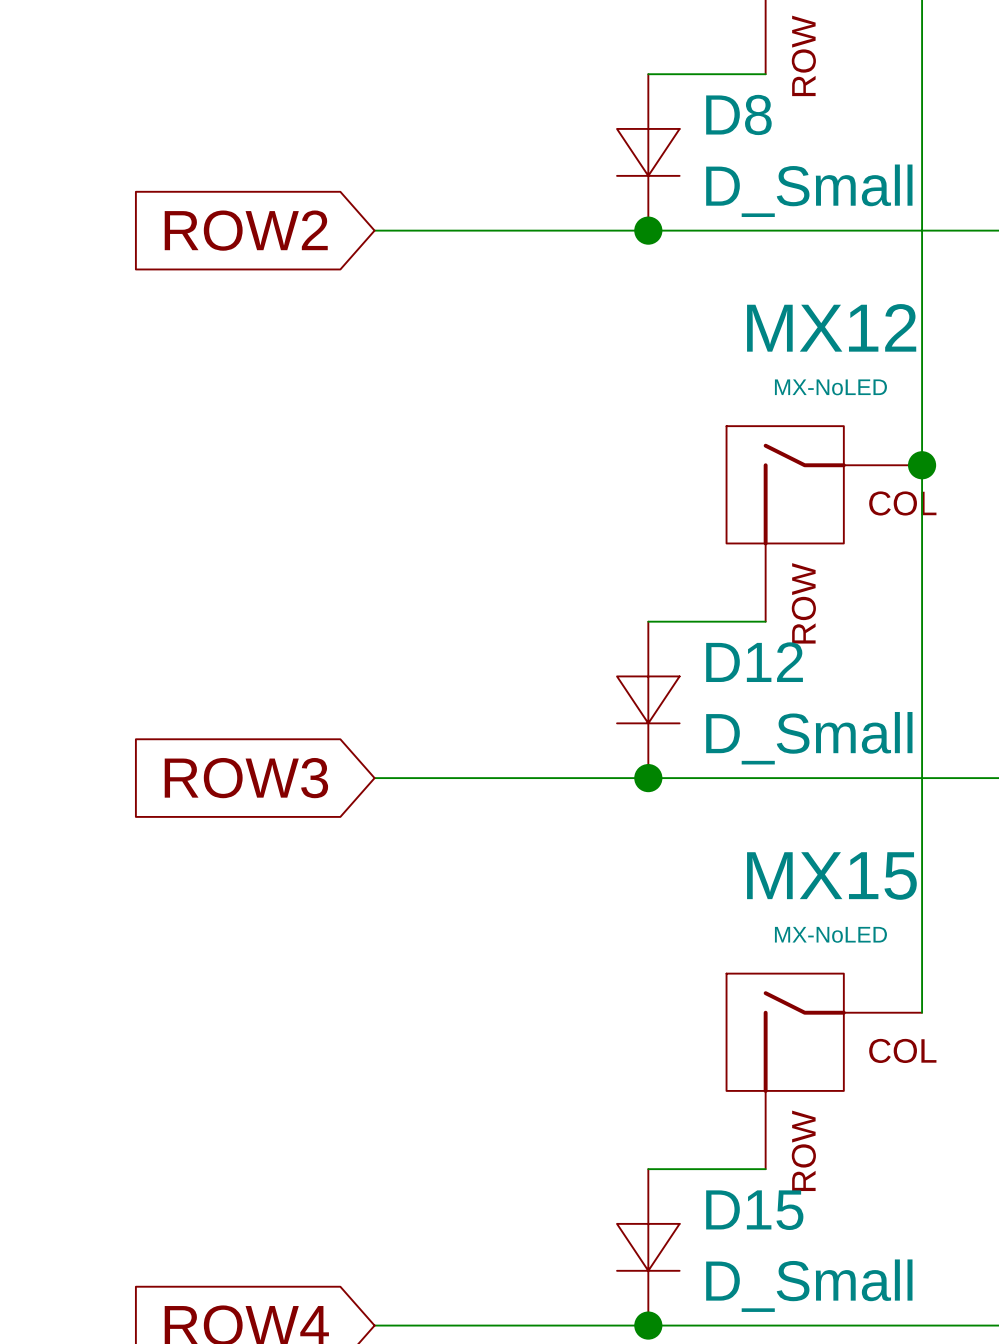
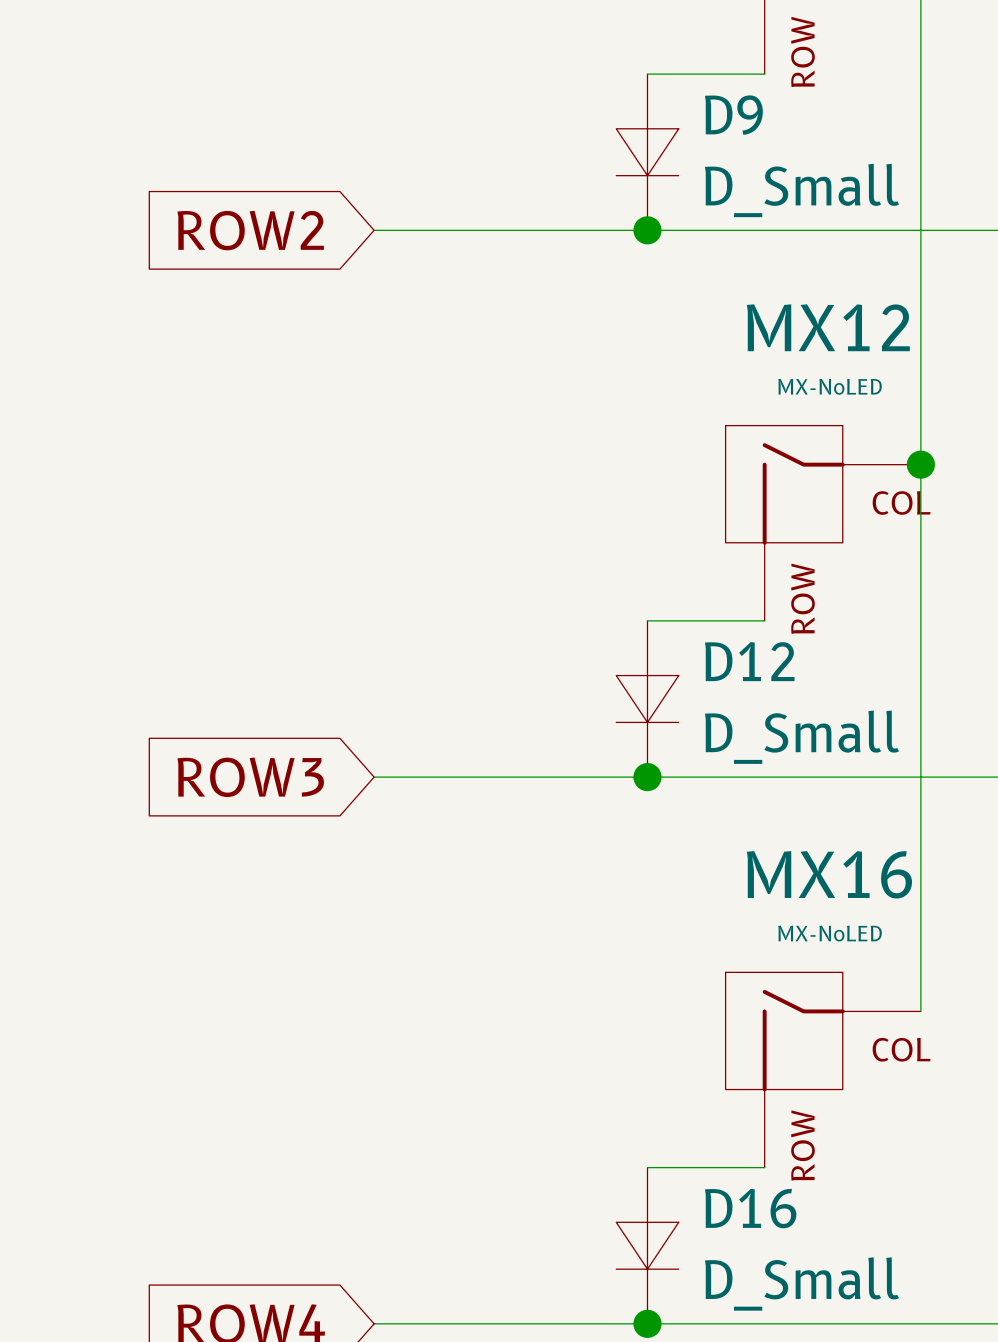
D8 name: D8 (738, 114) -> D9 (733, 115)
MX15 name: MX15 (831, 876) -> MX16 (829, 874)
D15 name: D15 (754, 1210) -> D16 (750, 1208)

